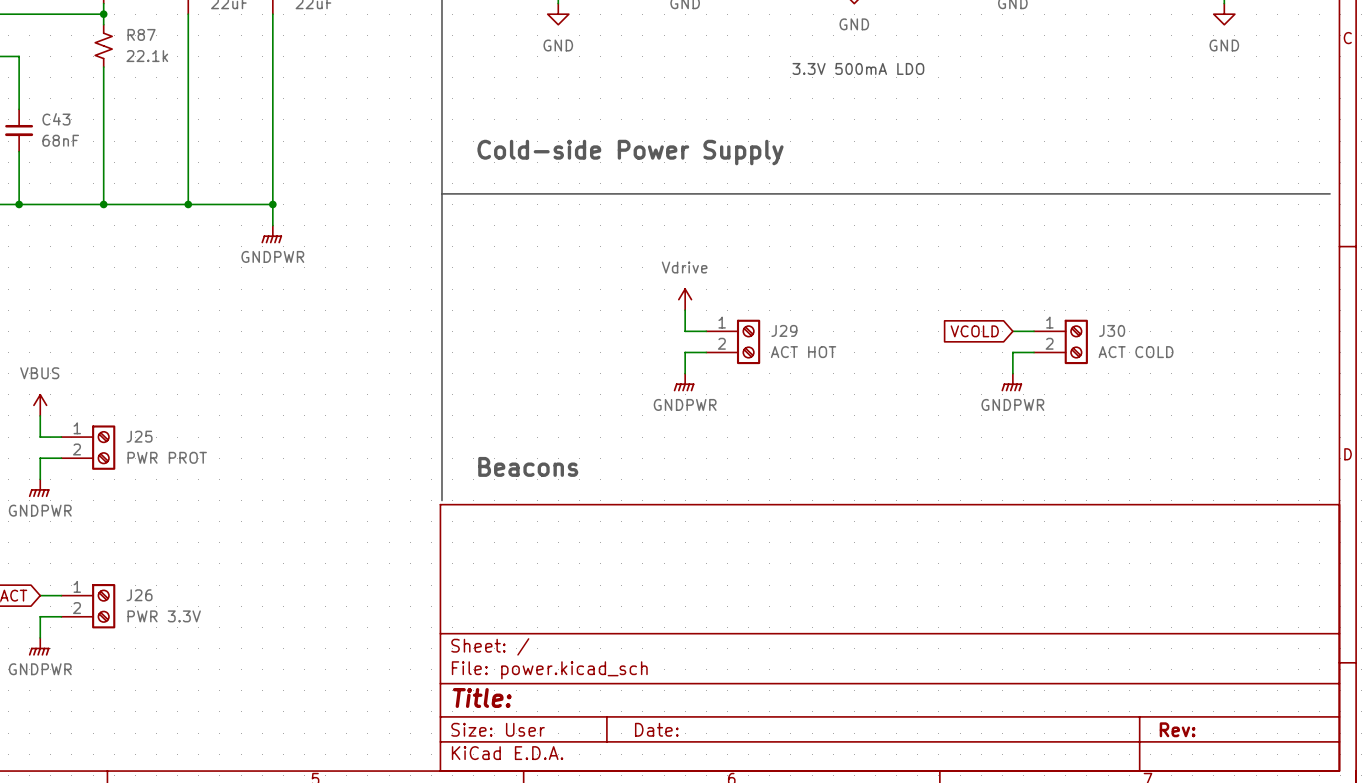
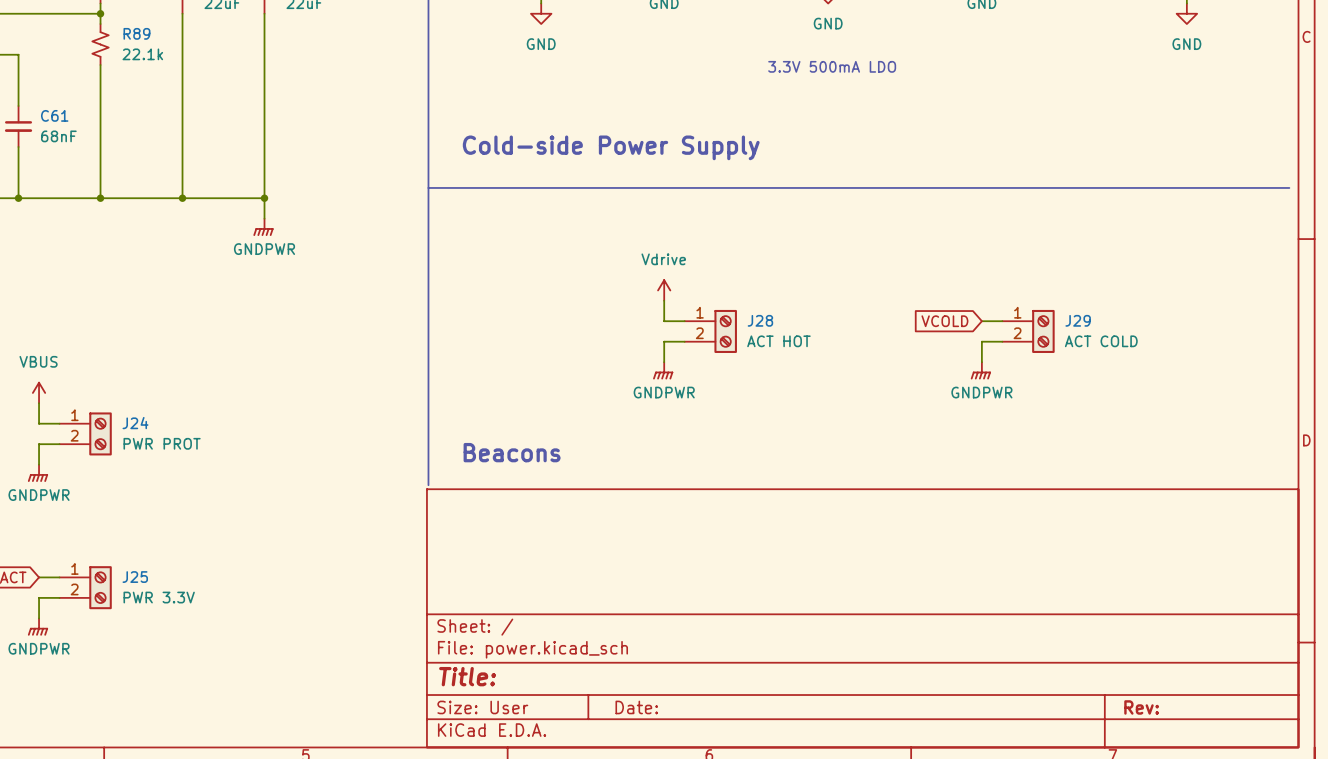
R87 name: R87 (141, 34) -> R89 (136, 33)
C43 name: C43 (56, 119) -> C61 (54, 115)
J29 name: J29 (784, 330) -> J28 (760, 320)
J30 name: J30 (1112, 330) -> J29 (1078, 320)
J25 name: J25 (139, 436) -> J24 (135, 423)
J26 name: J26 (139, 595) -> J25 (135, 577)

